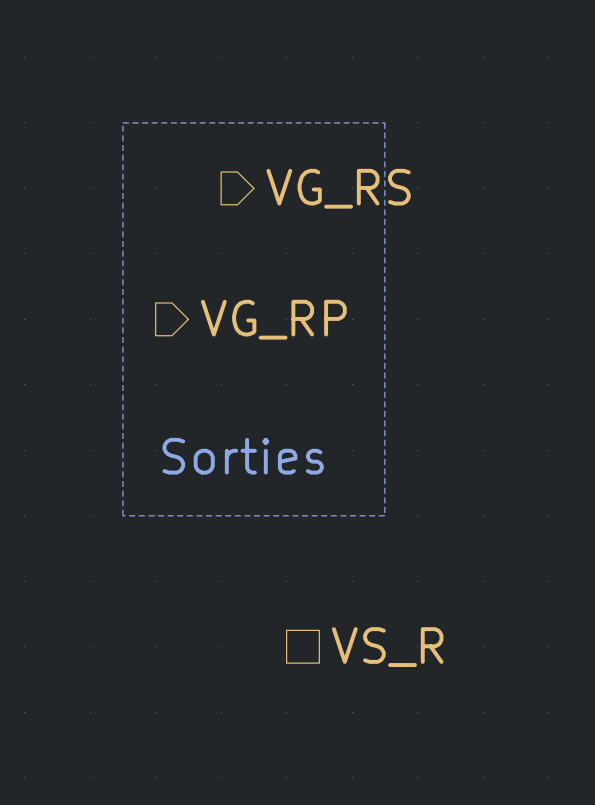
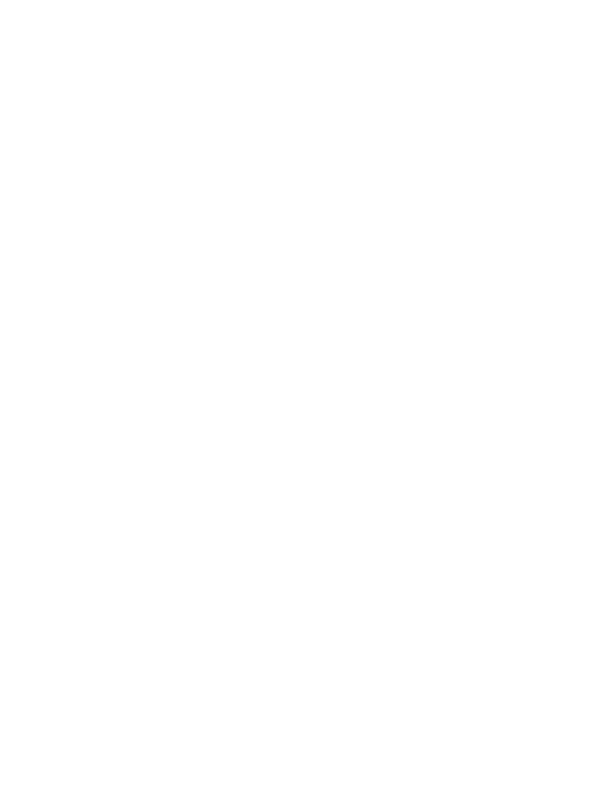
line: (122, 122) (384, 122) (384, 515) (122, 515) (122, 122) -> none
hierarchical label: VG_RS (338, 188) -> none
hierarchical label: VG_RP (273, 319) -> none
text: Sorties (243, 456) -> none
hierarchical label: VS_R (387, 647) -> none

